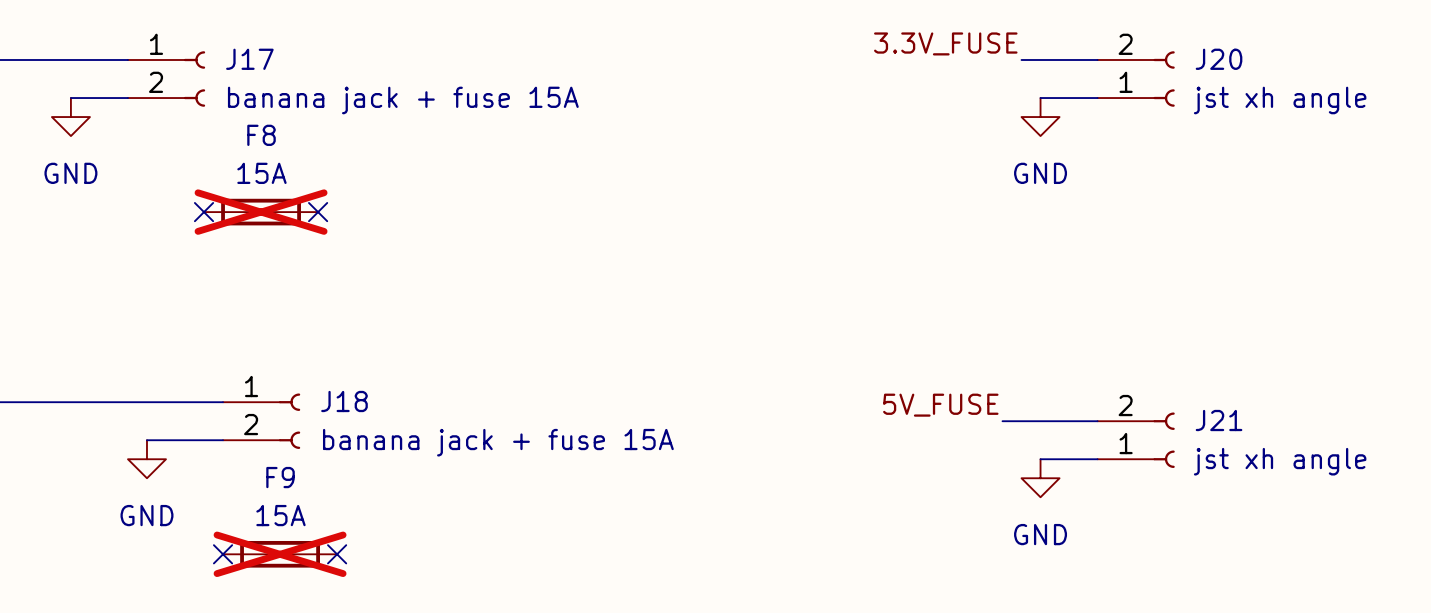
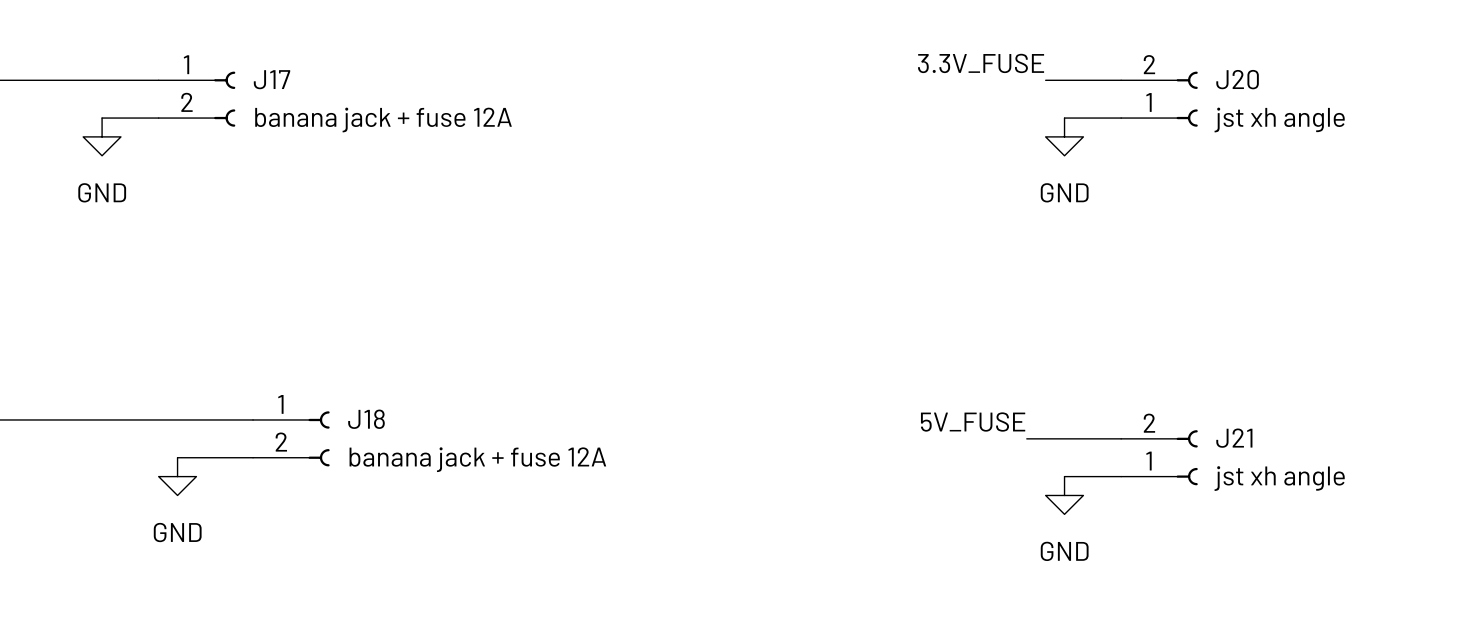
J17 value: banana jack + fuse 15A (403, 100) -> banana jack + fuse 12A (383, 120)
no-connect mark: (204, 212) -> none
F8: 15A (261, 212) -> none
no-connect mark: (318, 212) -> none
J18 value: banana jack + fuse 15A (498, 442) -> banana jack + fuse 12A (477, 459)
no-connect mark: (223, 554) -> none
F9: 15A (280, 554) -> none
no-connect mark: (337, 554) -> none

